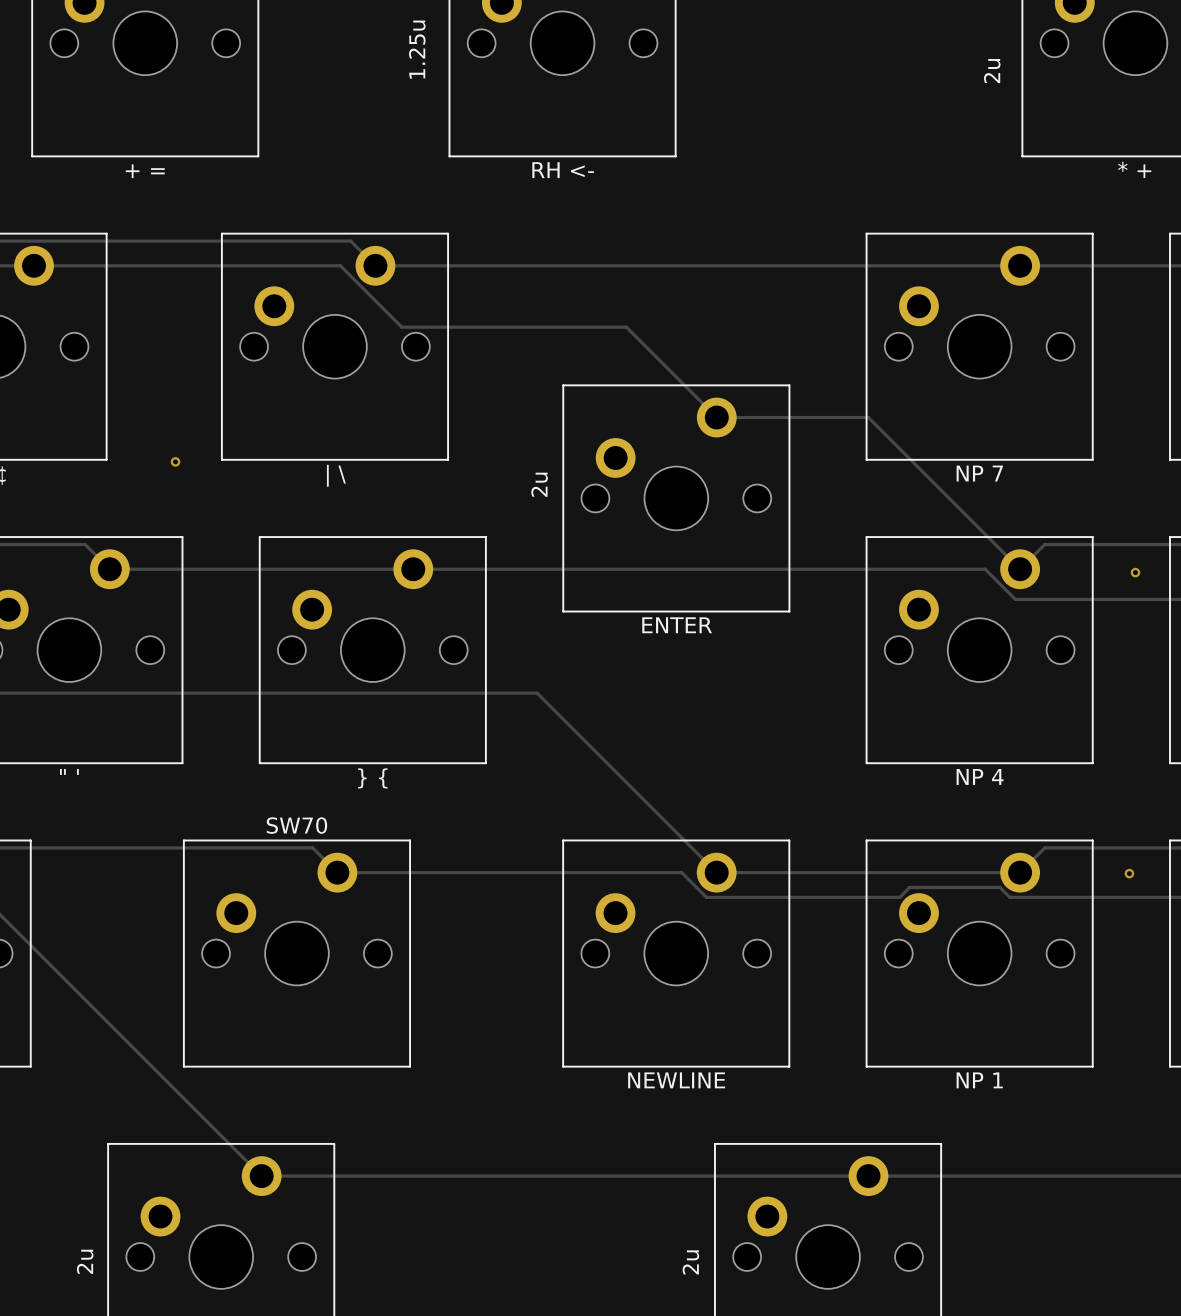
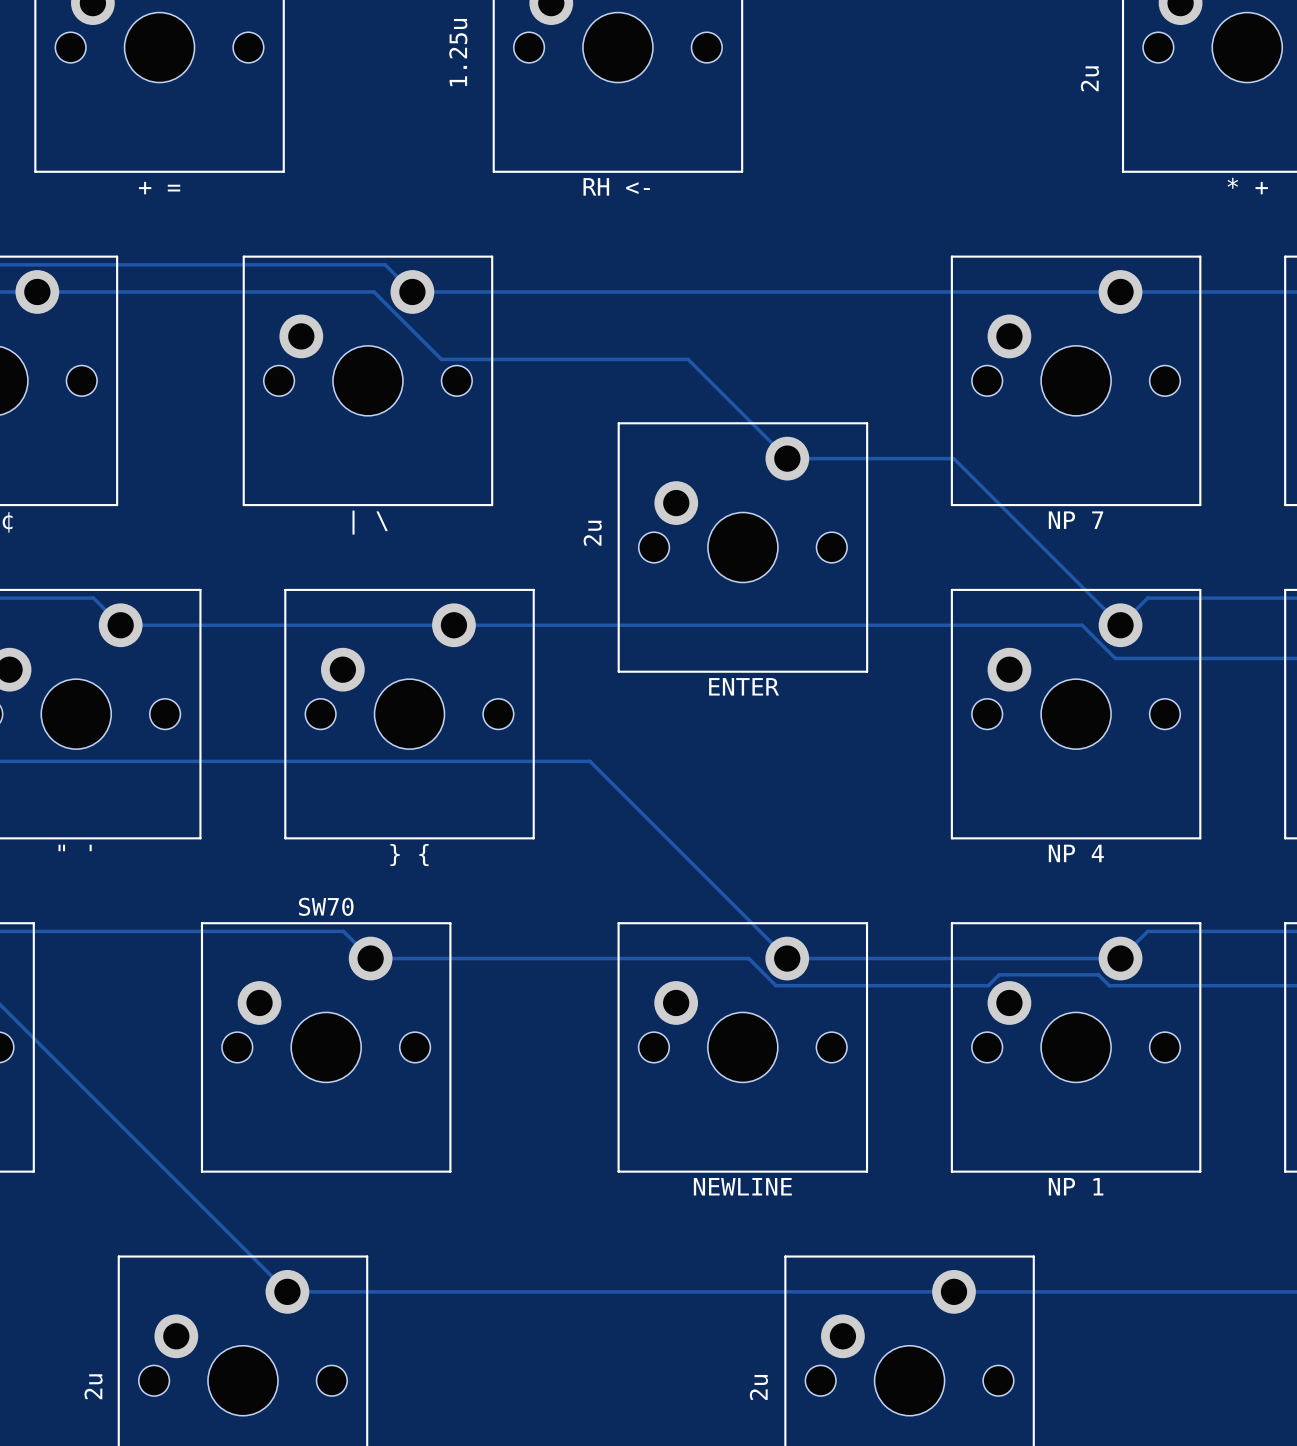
via: (175, 461) -> none
via: (1135, 572) -> none
via: (1129, 873) -> none

